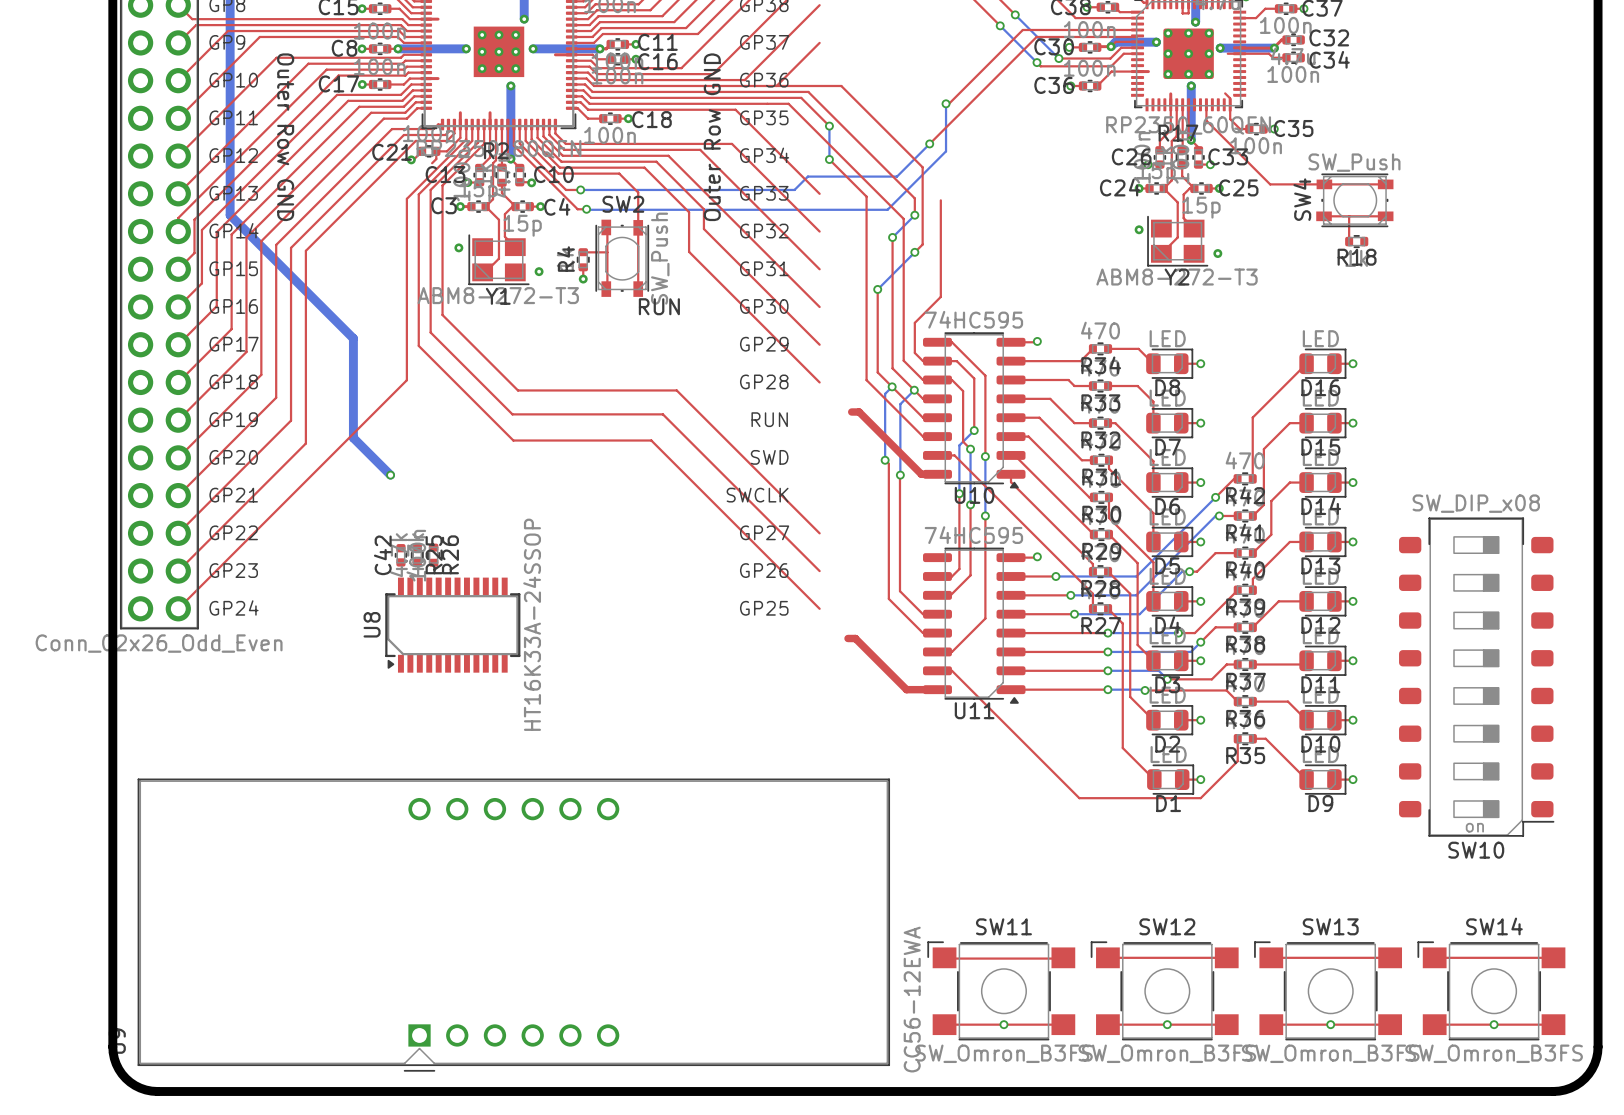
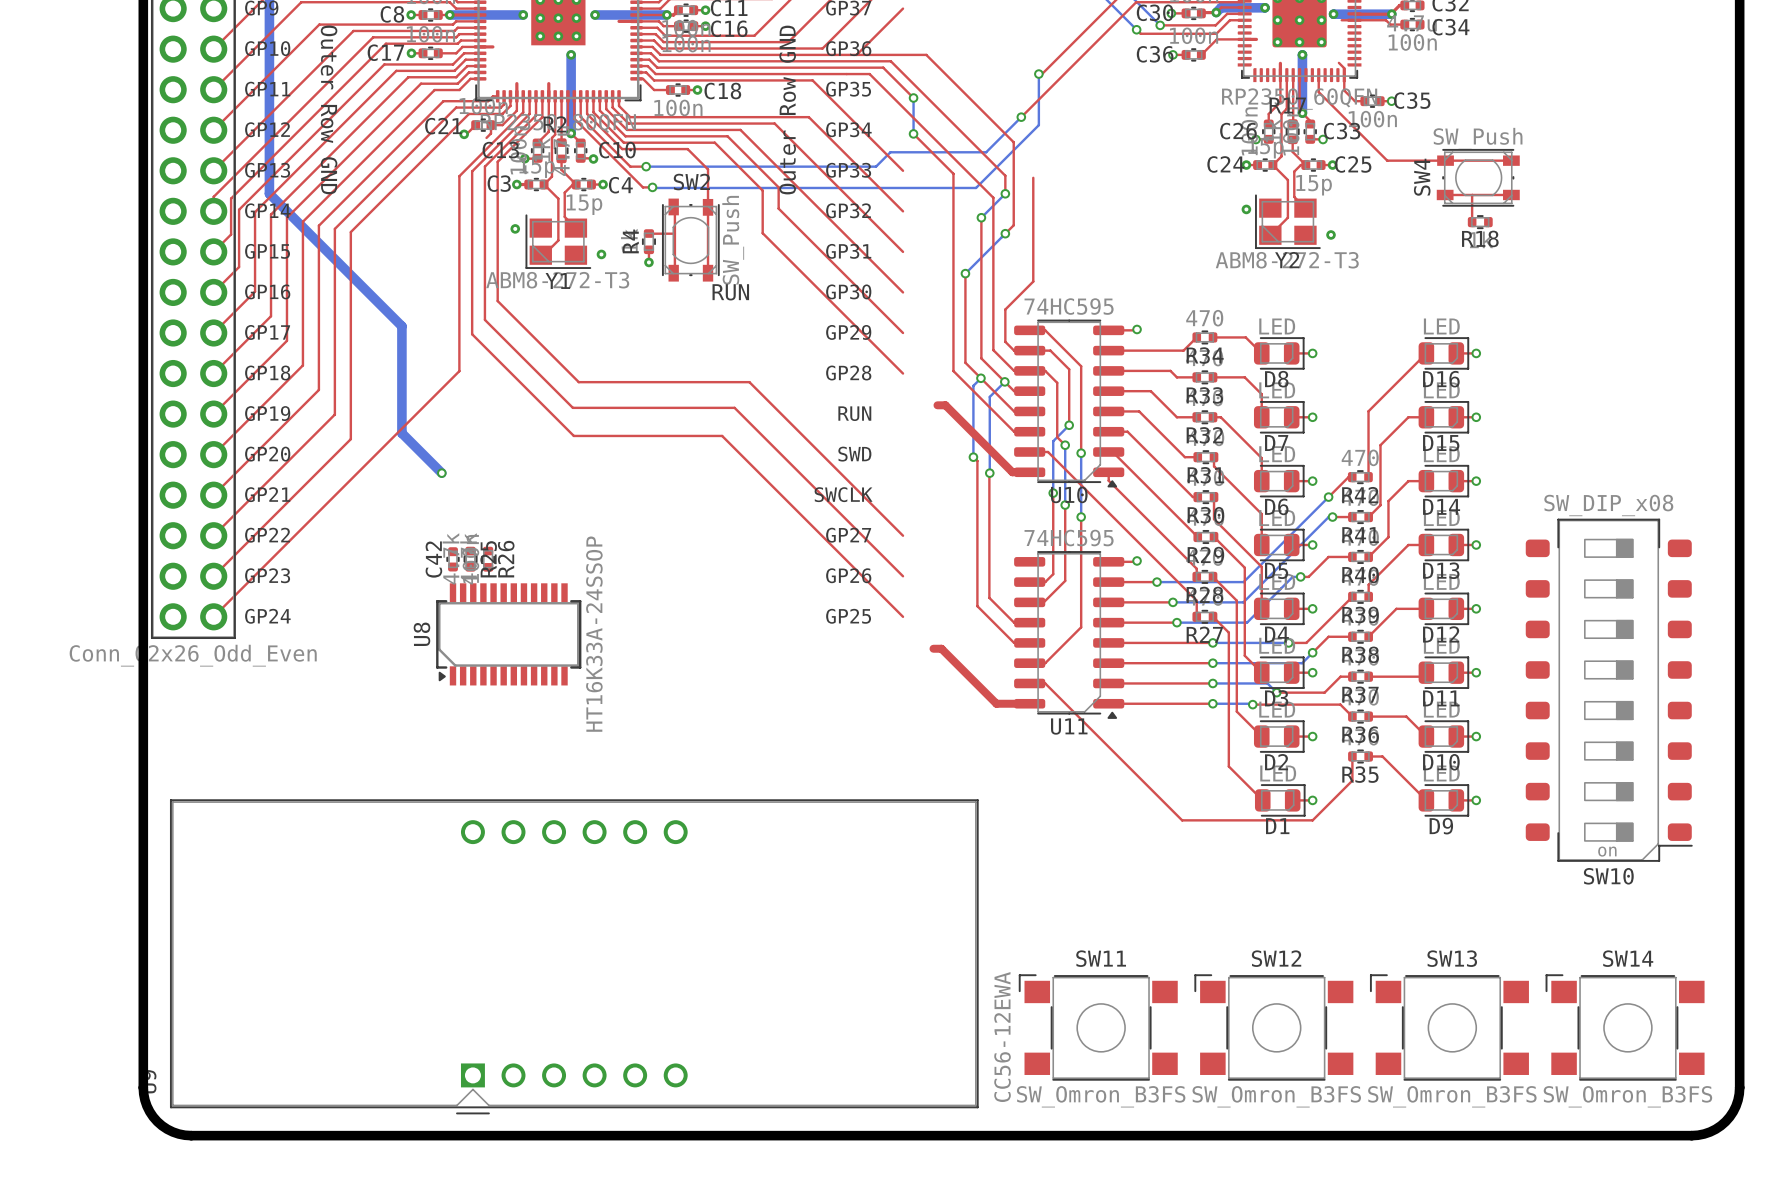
top track: (1107, 957) (1226, 957) -> none
top track: (1271, 957) (1390, 957) -> none
top track: (1434, 957) (1553, 957) -> none
top track: (944, 958) (1063, 958) -> none
top track: (944, 1024) (1063, 1024) -> none
via: (1003, 1024) -> none
top track: (1107, 1024) (1226, 1024) -> none
via: (1167, 1024) -> none
top track: (1271, 1024) (1390, 1024) -> none
via: (1330, 1024) -> none
top track: (1434, 1024) (1553, 1024) -> none
via: (1494, 1024) -> none

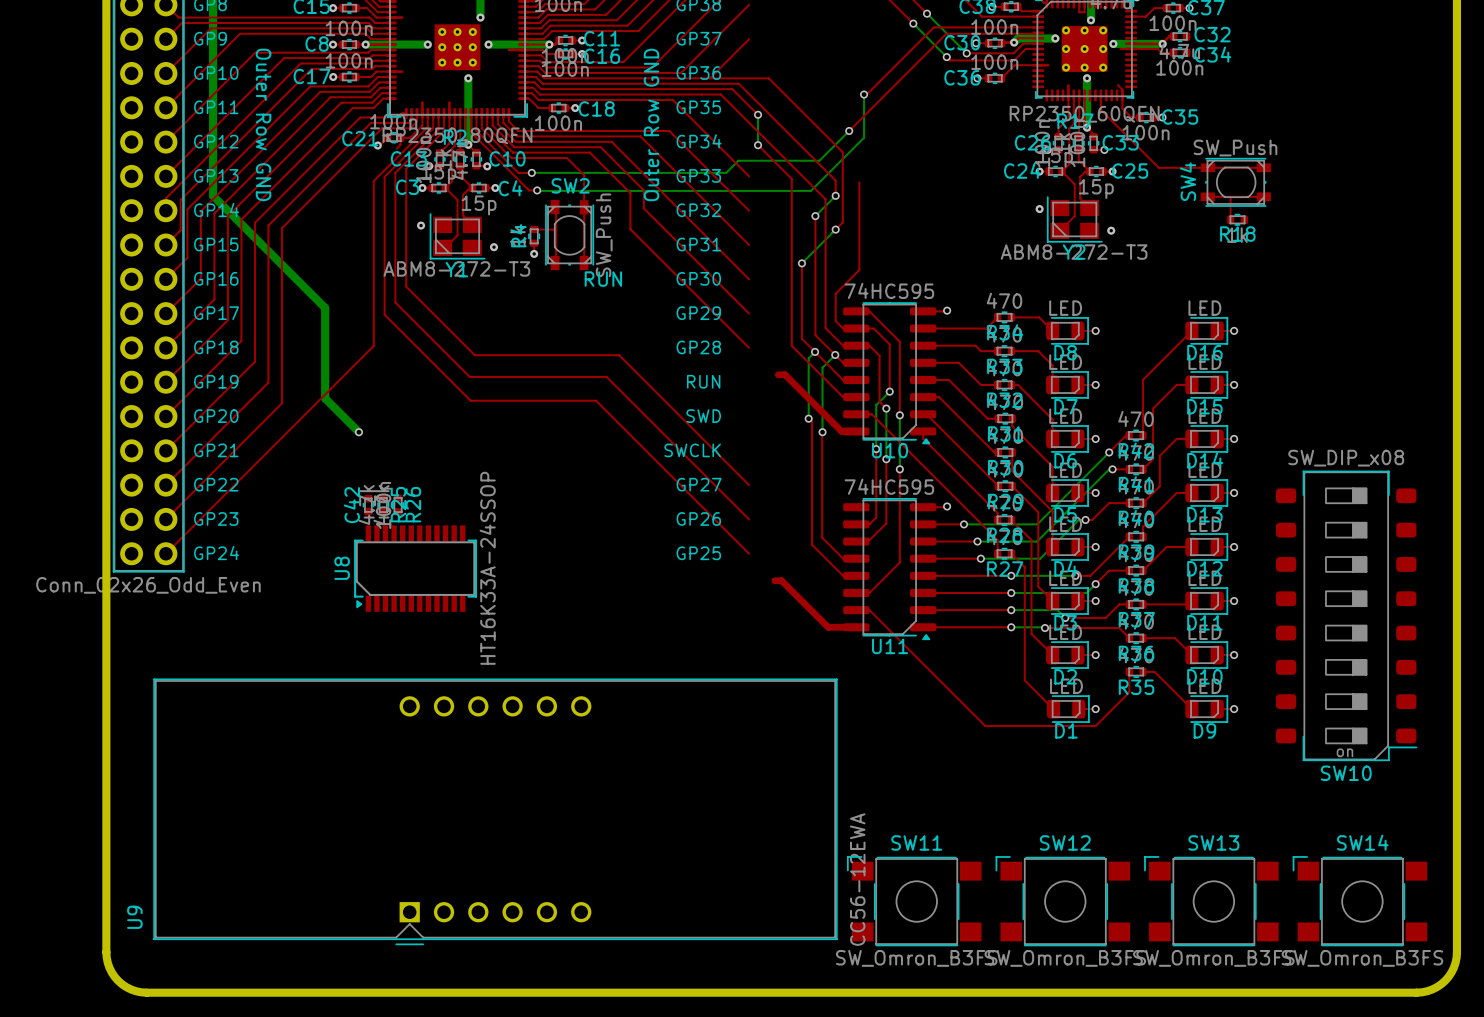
U9 position: (574, 956) -> (495, 811)

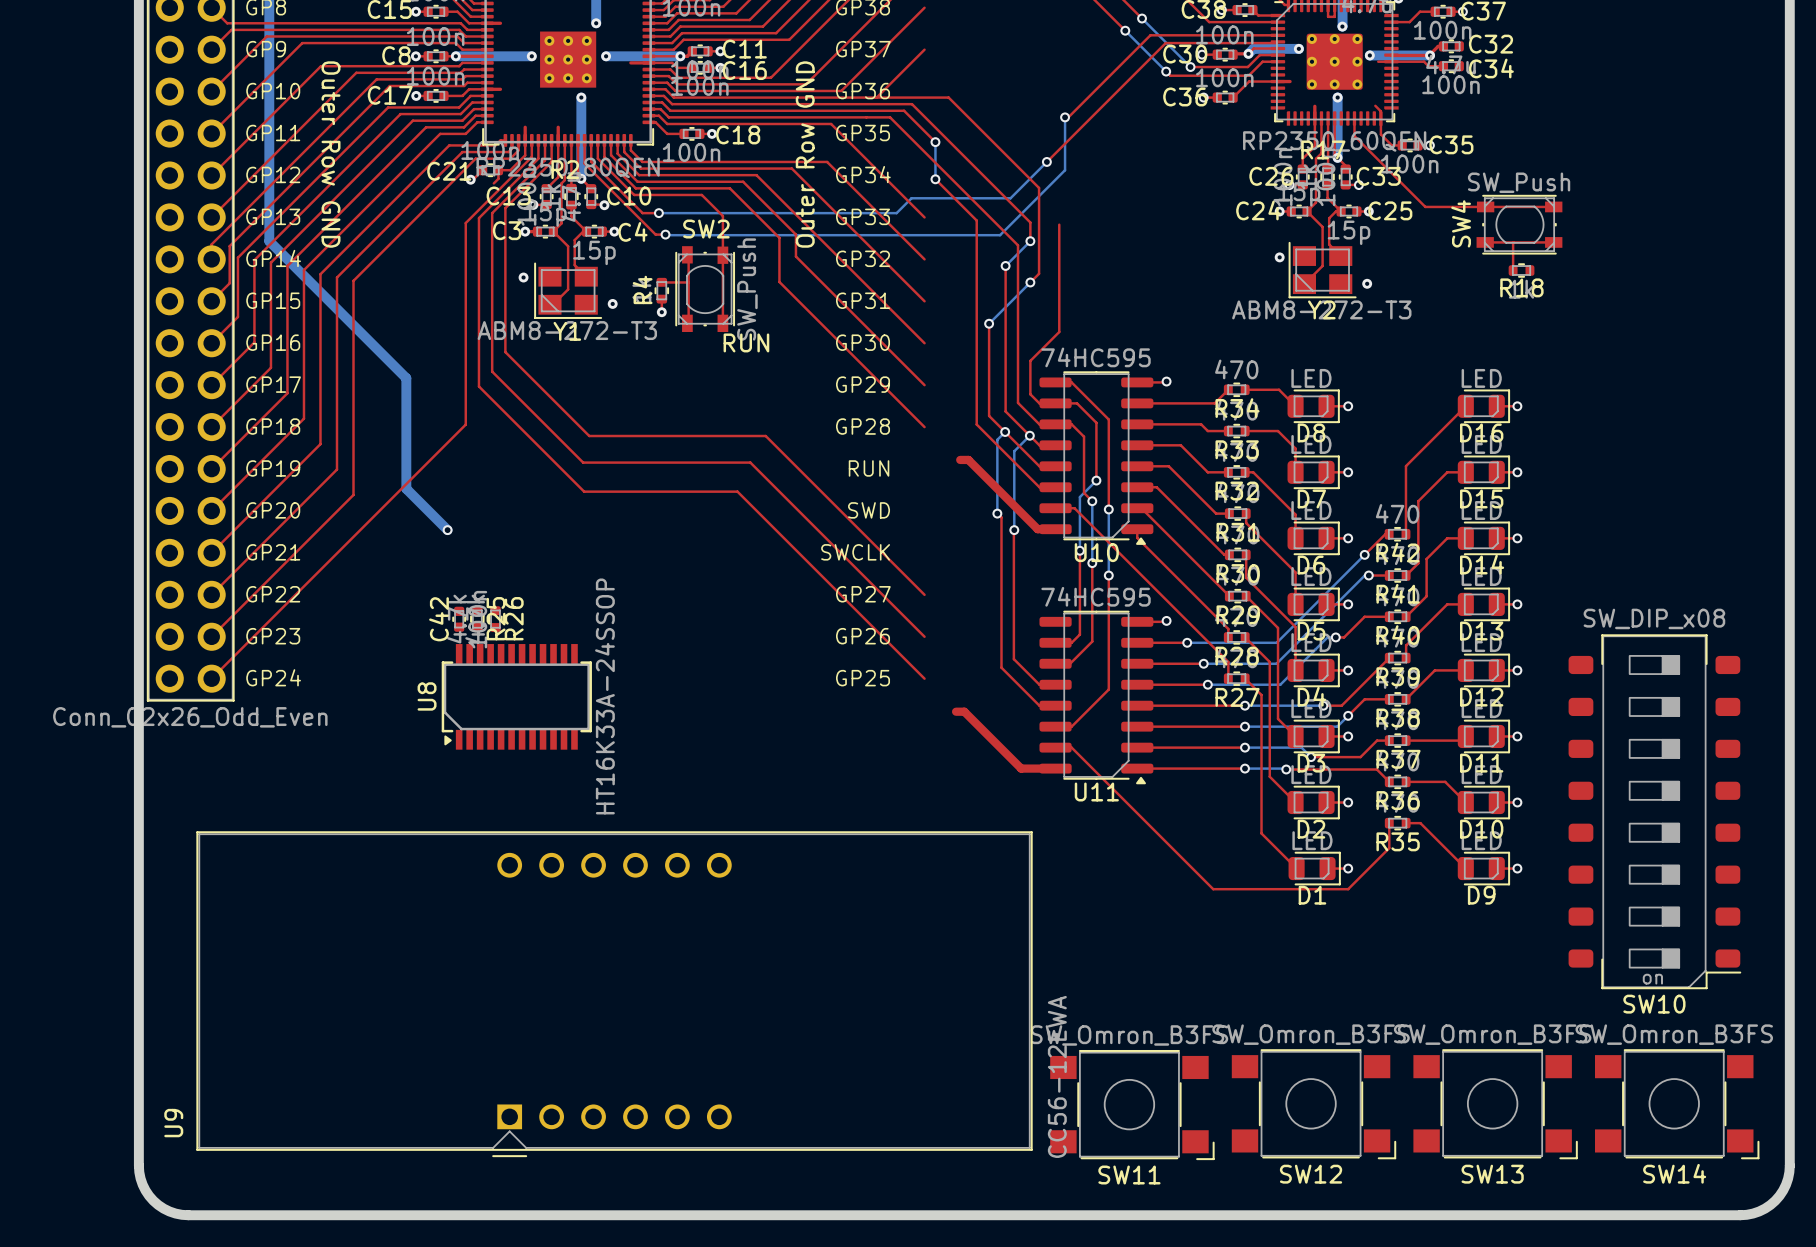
SW10 position: (1346, 615) -> (1654, 811)
SW11 rotation: 0° (914, 901) -> 180° (1132, 1105)
SW12 rotation: 0° (1062, 901) -> 180° (1314, 1104)
SW13 rotation: 0° (1211, 901) -> 180° (1495, 1104)
SW14 rotation: 0° (1360, 901) -> 180° (1677, 1104)

